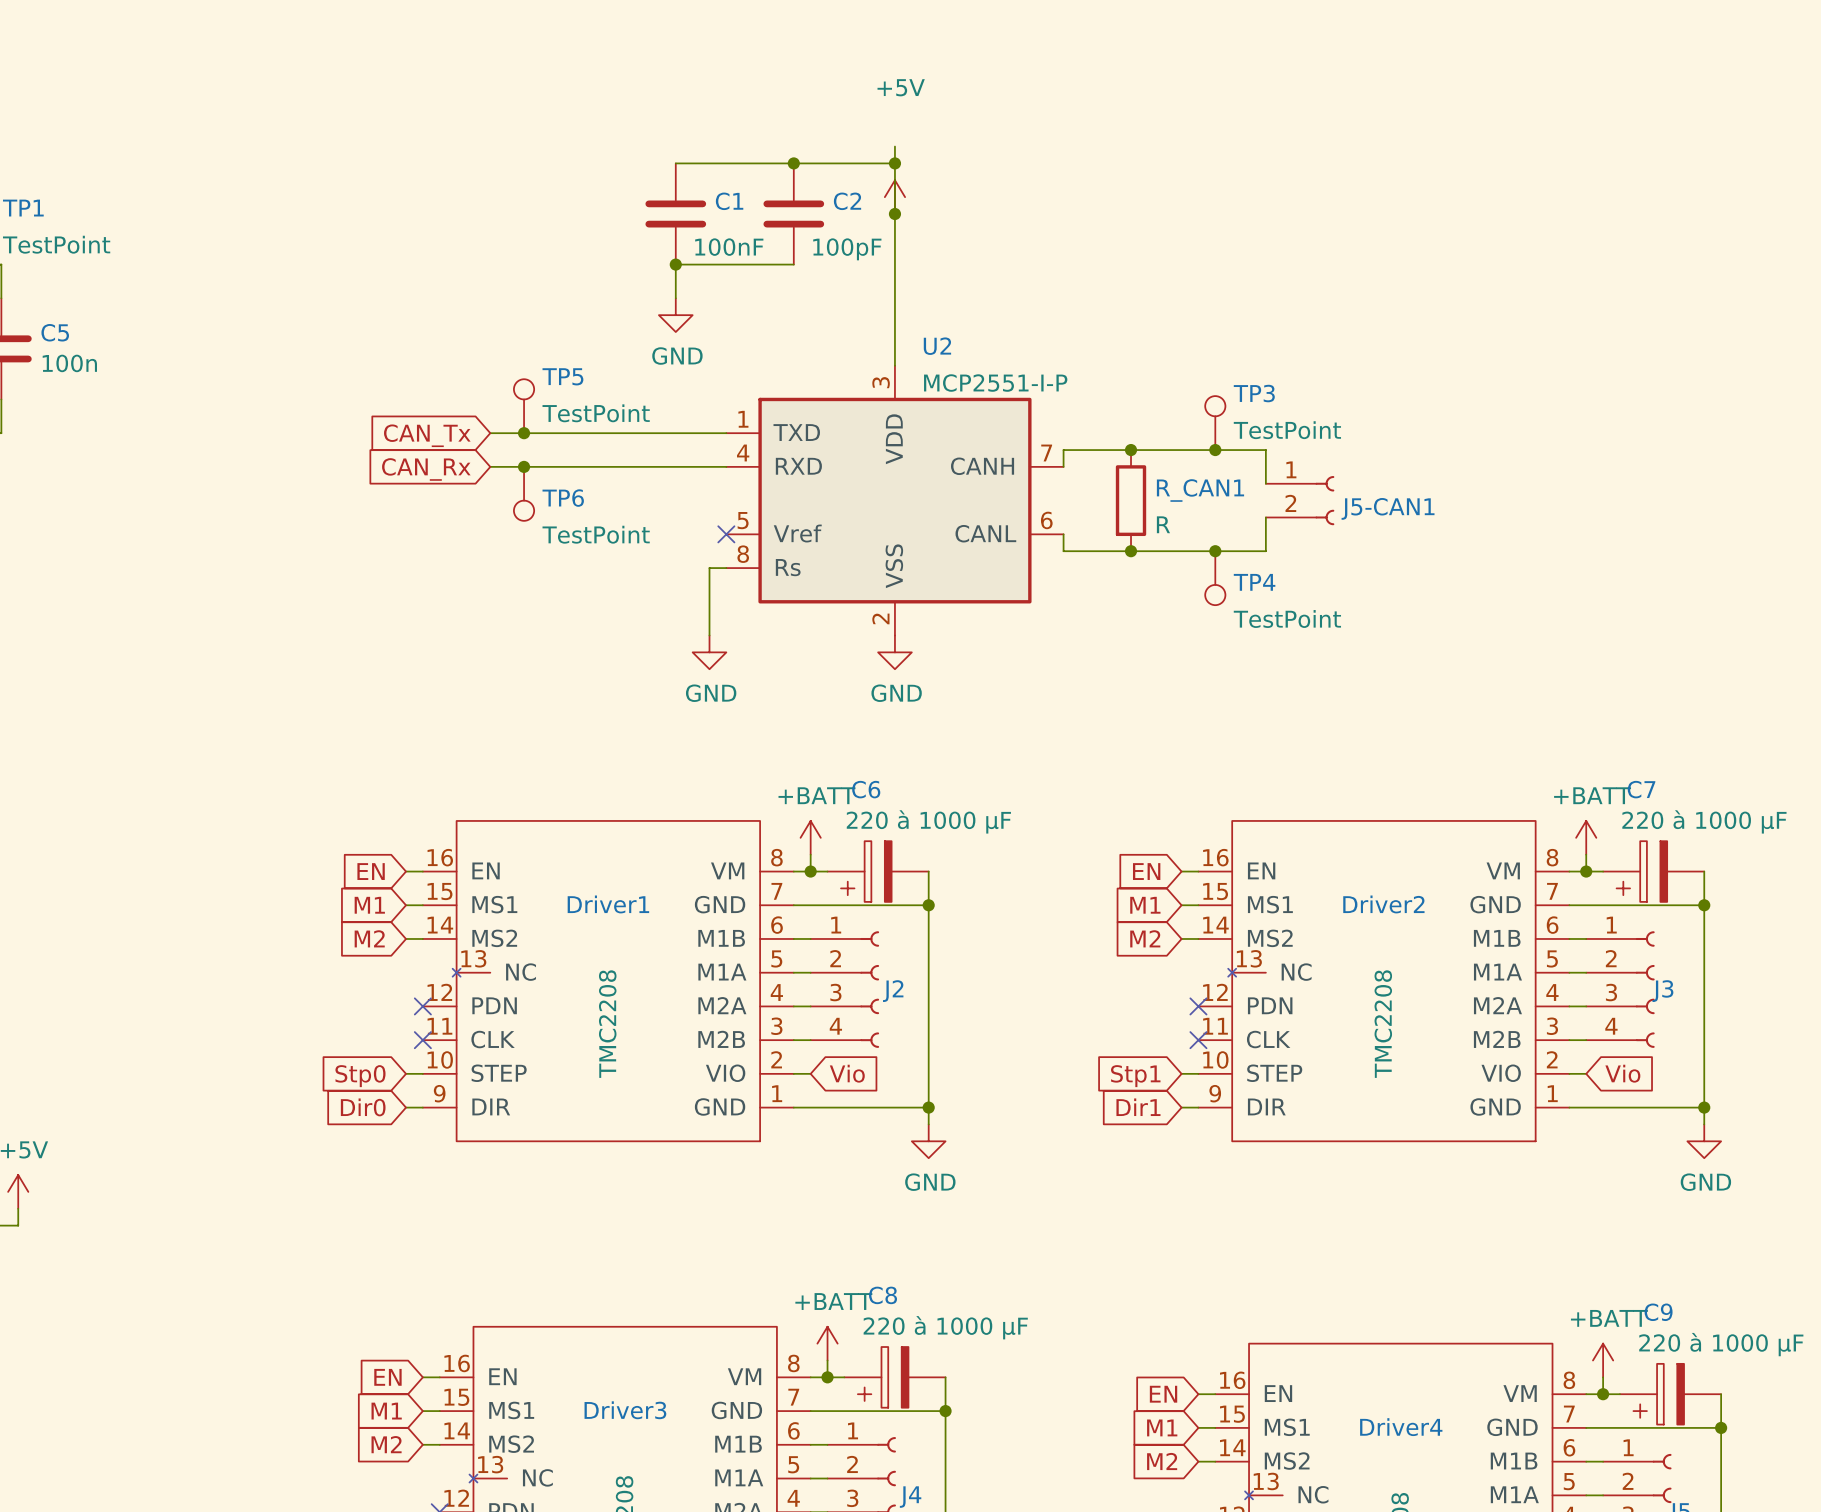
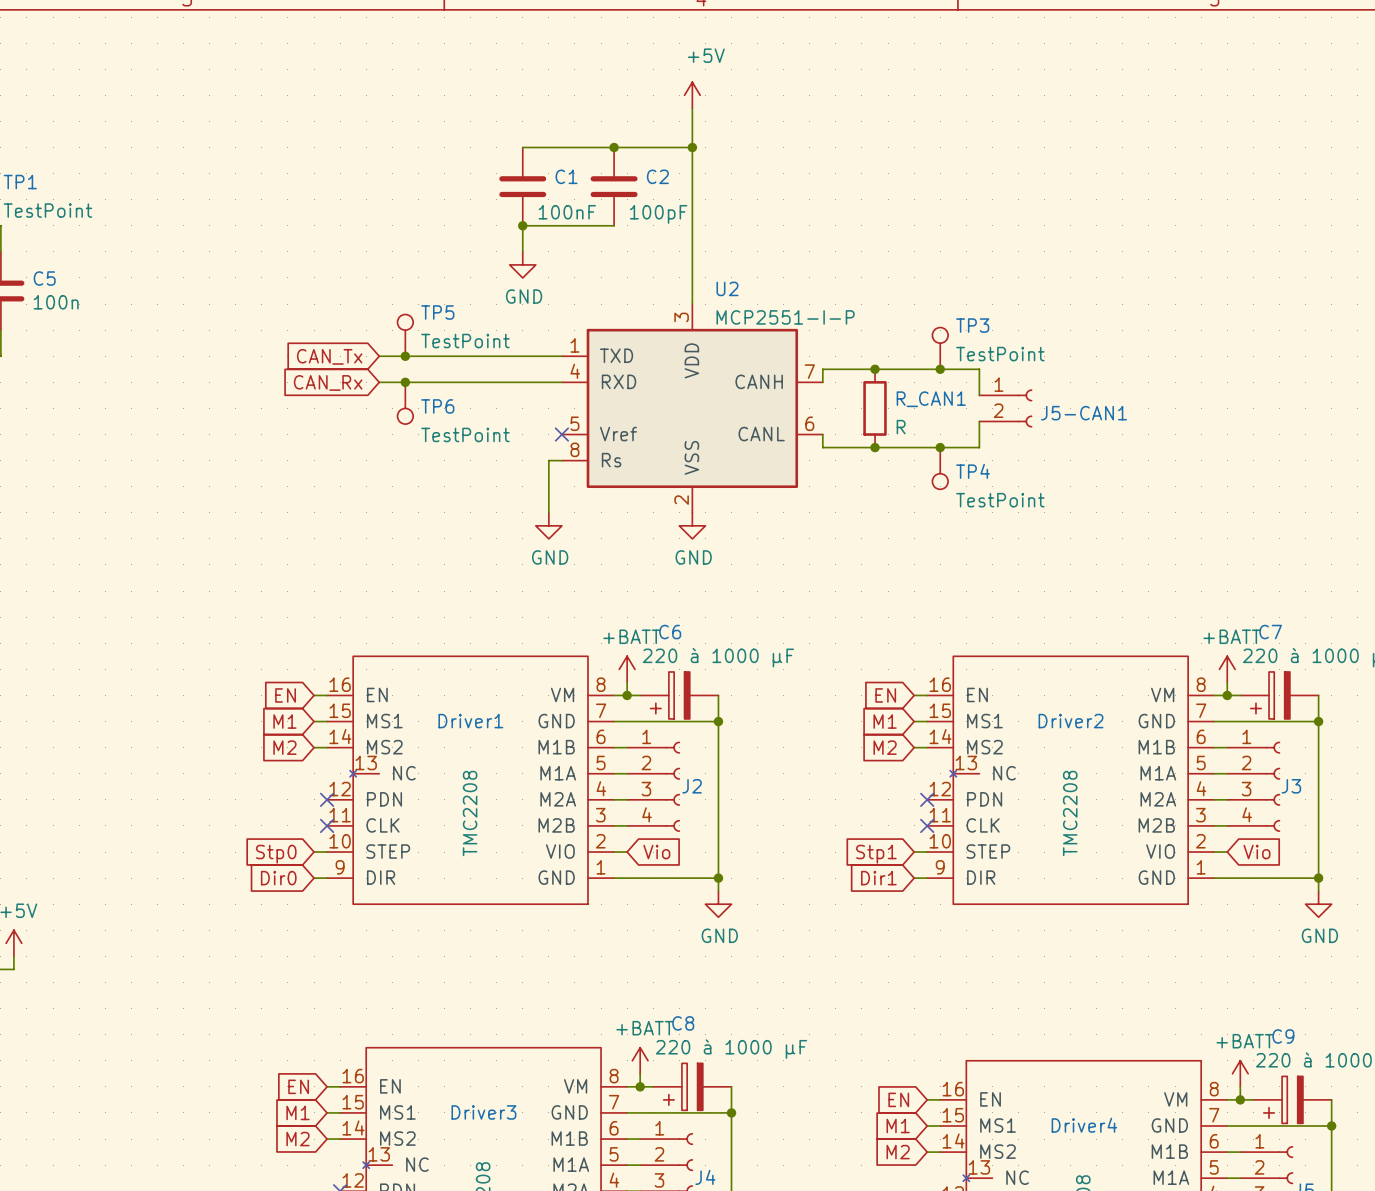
power symbol text position: +5V (901, 87) -> +5V (706, 55)
wire: none -> (692, 108) (692, 134)
power symbol position: +5V (894, 197) -> +5V (692, 95)
junction: (894, 214) -> none

